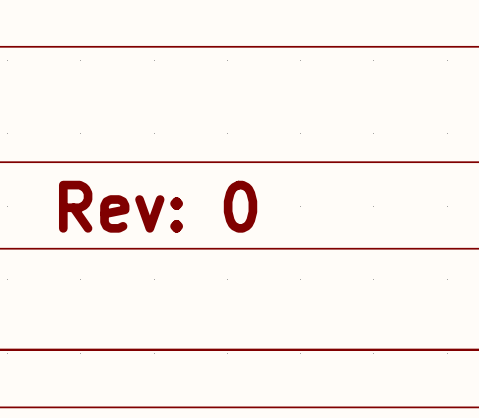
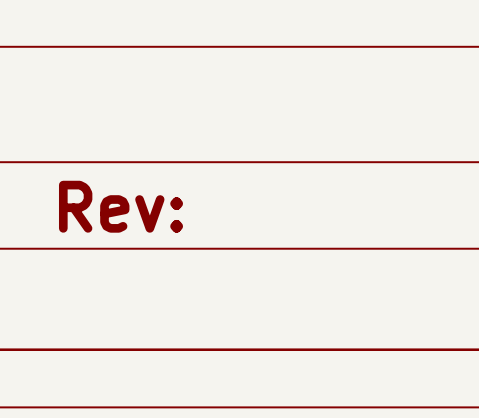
title block: Rev: 0 (158, 206) -> Rev: (121, 206)

